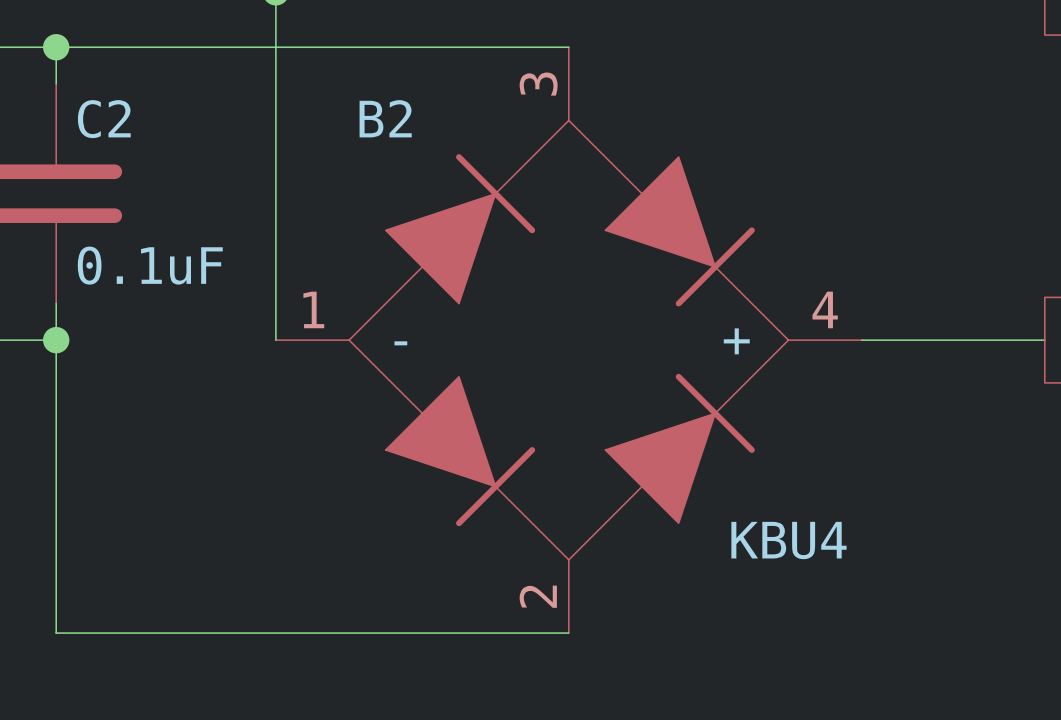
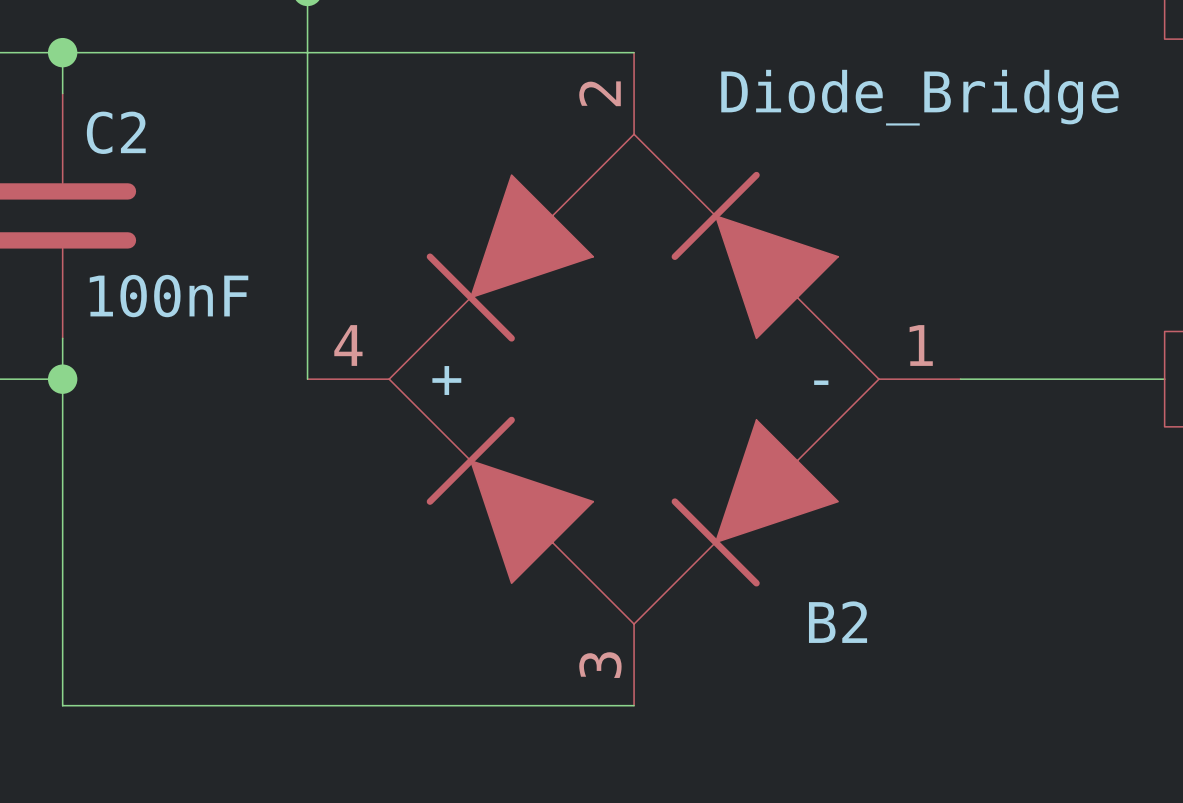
C2 value: 0.1uF (150, 265) -> 100nF (169, 296)
B2 rotation: 0° (568, 340) -> 180° (634, 379)
B2 value: KBU4 (788, 540) -> Diode_Bridge (919, 97)

